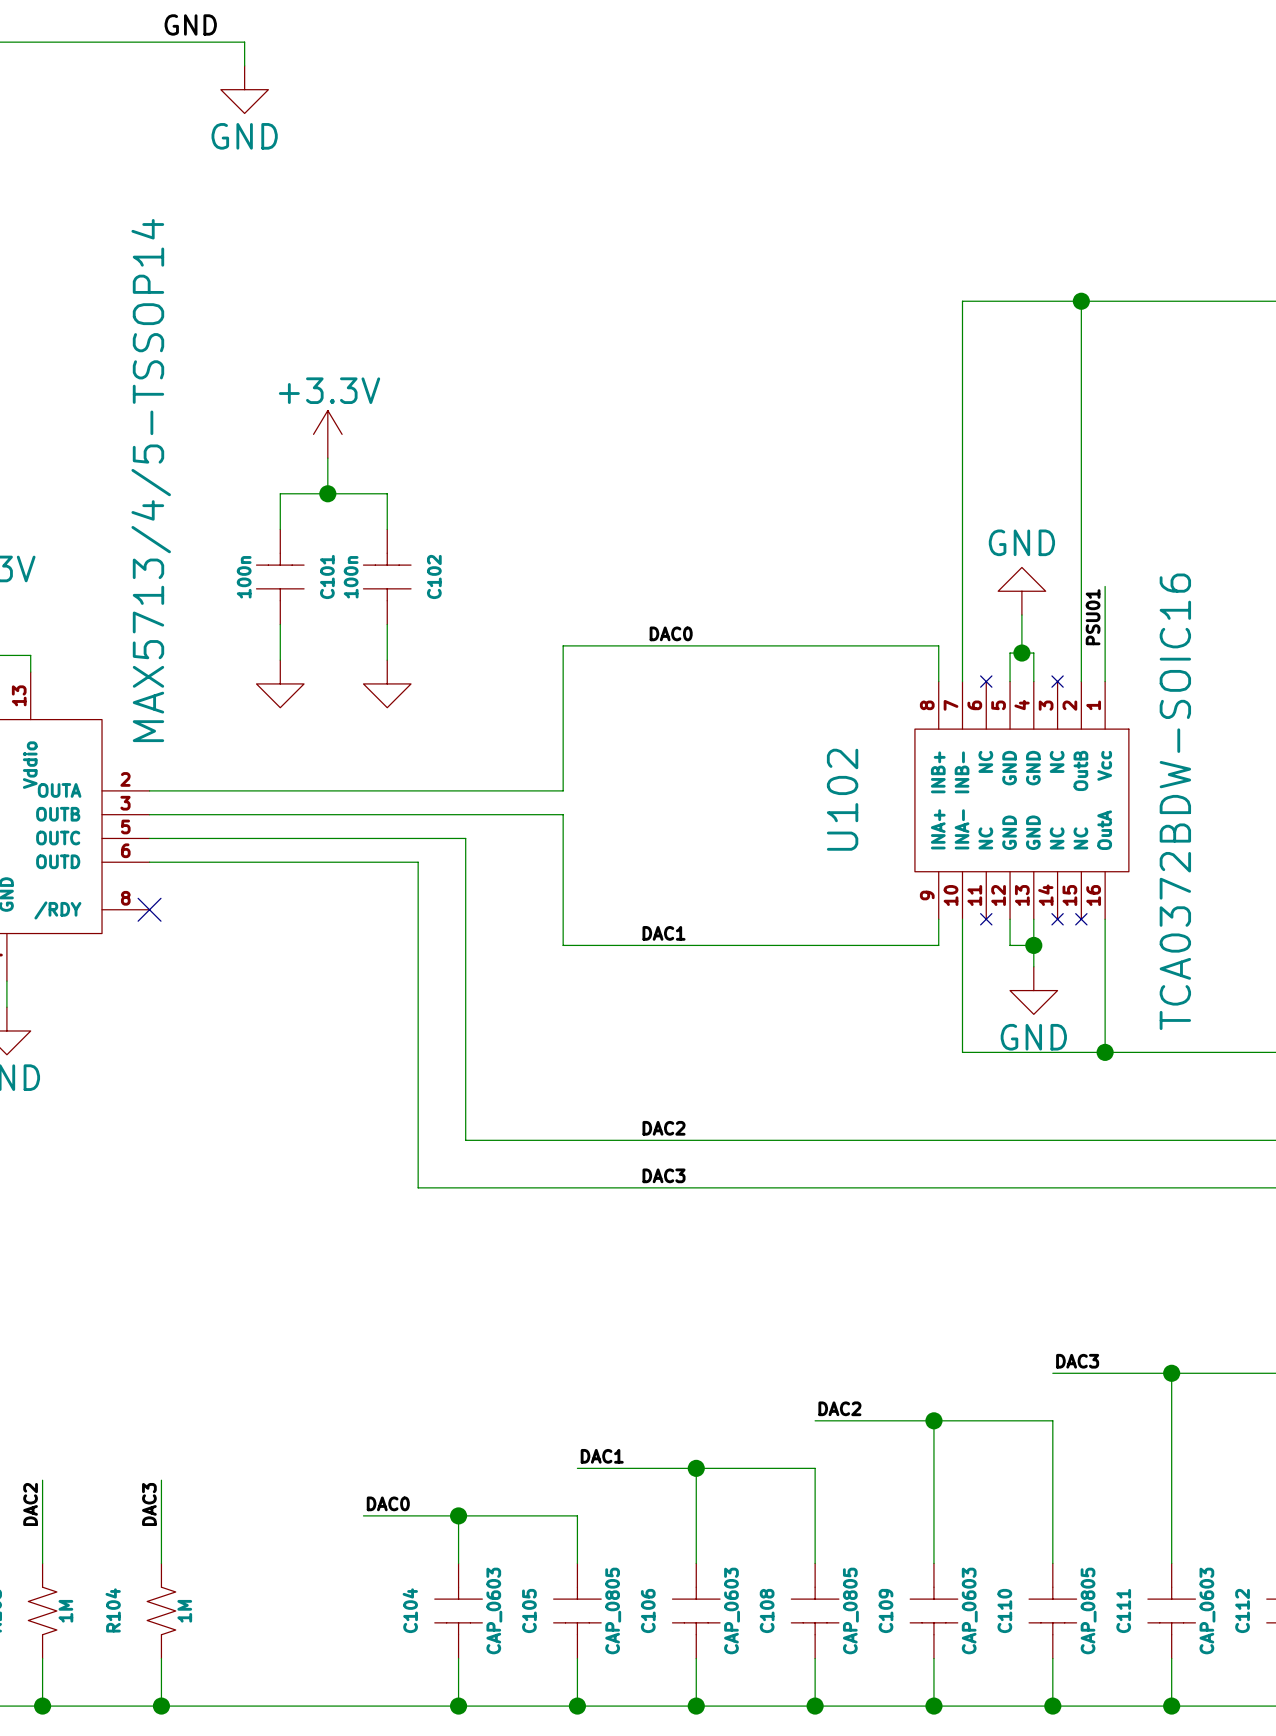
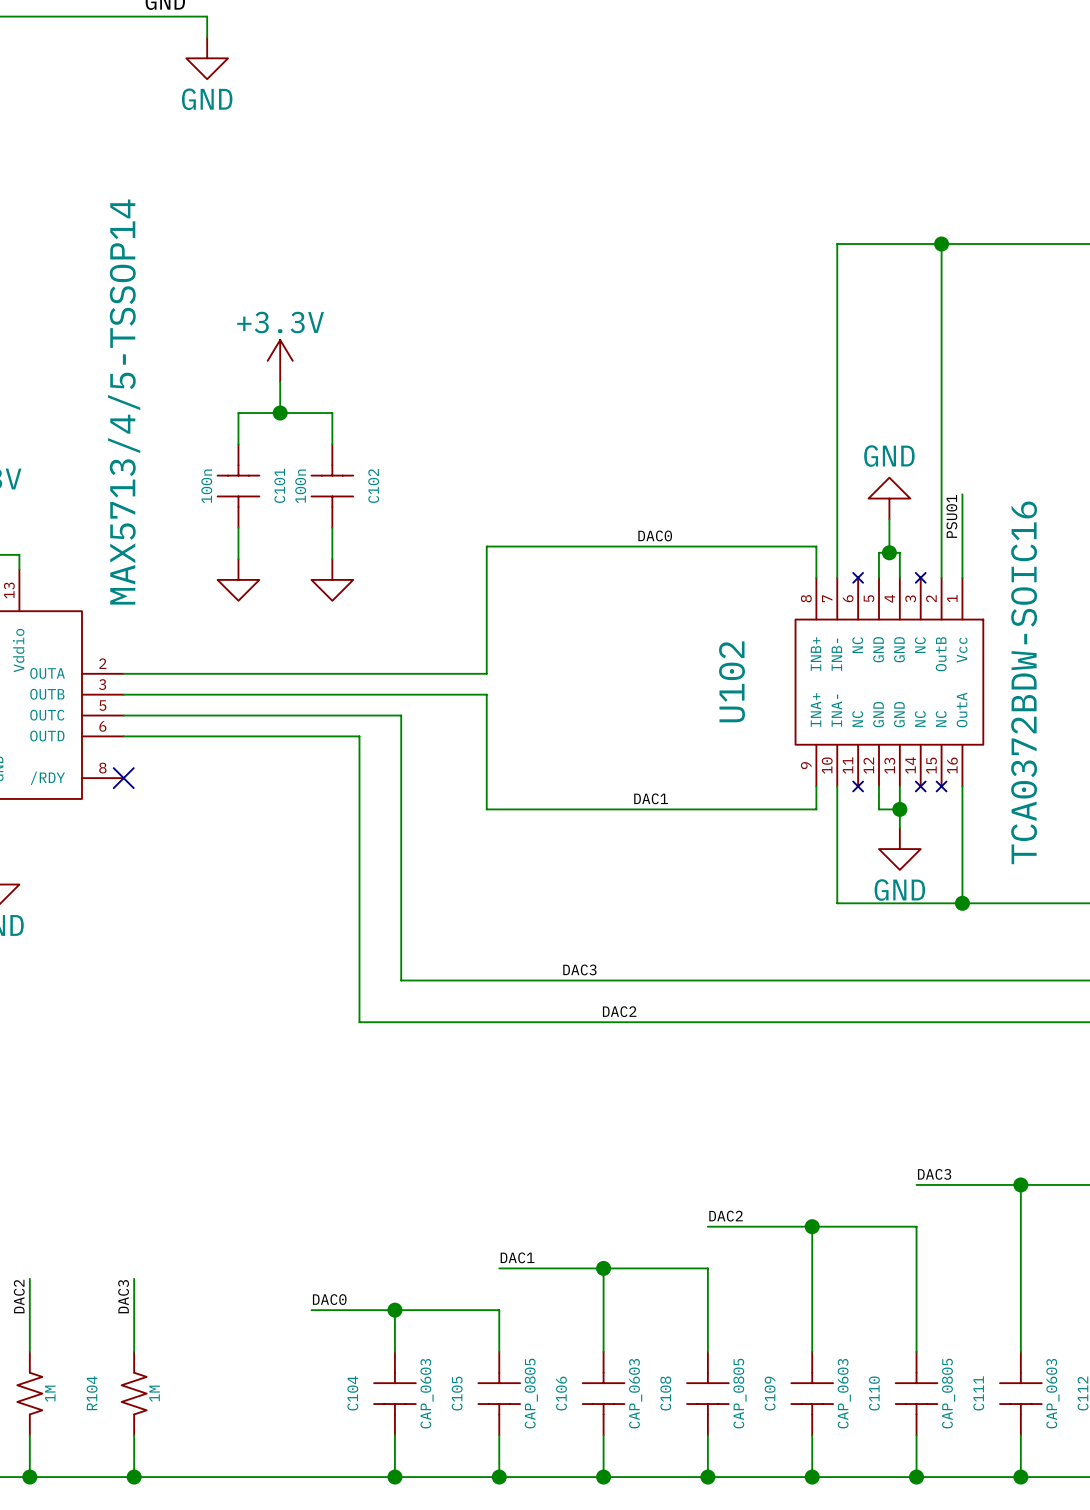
label position: DAC0 (671, 633) -> DAC0 (655, 535)
label position: DAC1 (664, 933) -> DAC1 (651, 798)
label: DAC2 (664, 1128) -> DAC3 (579, 969)
label: DAC3 (664, 1175) -> DAC2 (619, 1011)

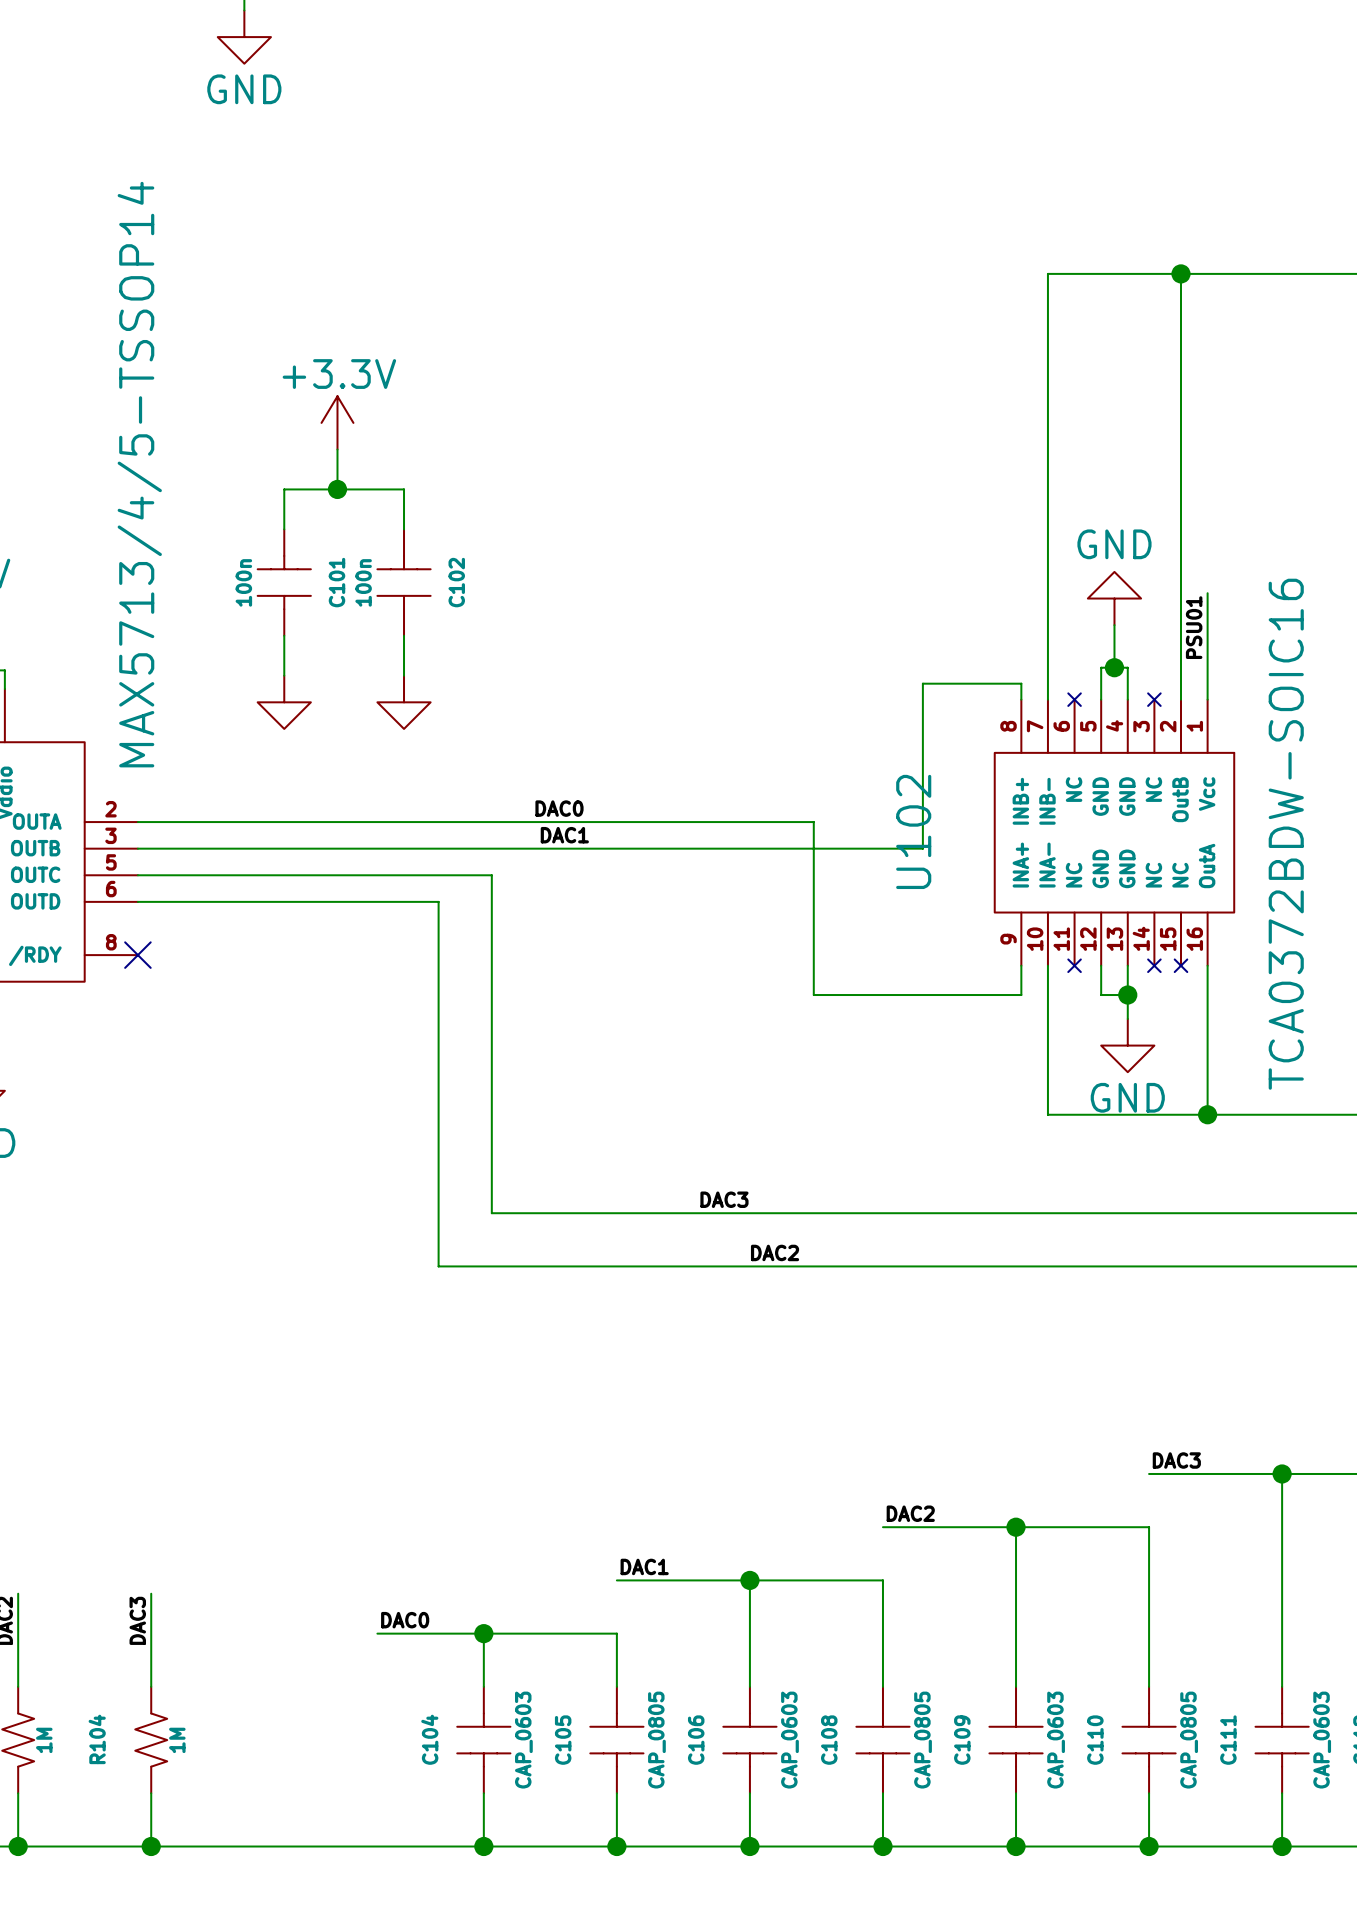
label position: DAC0 (655, 535) -> DAC0 (559, 808)
wire: (816, 565) (816, 546) (486, 546) (486, 673) -> (1021, 683) (922, 683) (922, 848) (600, 848)
wire: (486, 694) (486, 809) (653, 809) -> (600, 822) (813, 822) (813, 995)
label position: DAC1 (651, 798) -> DAC1 (564, 835)

